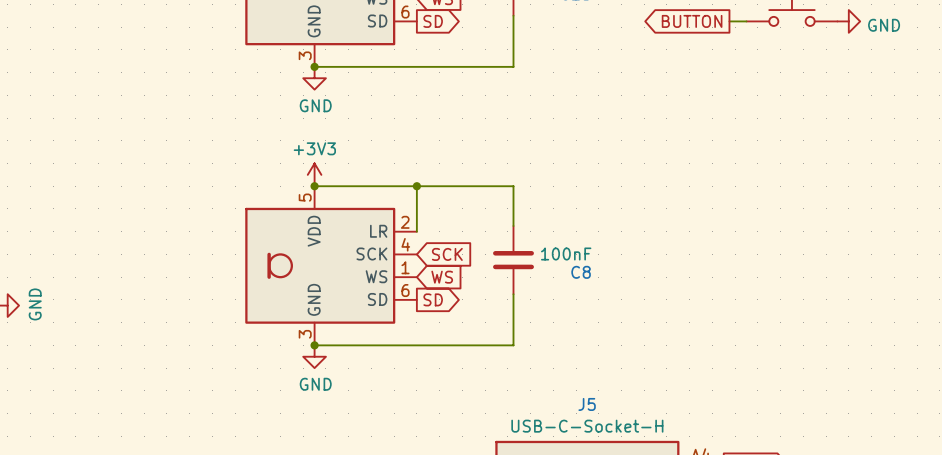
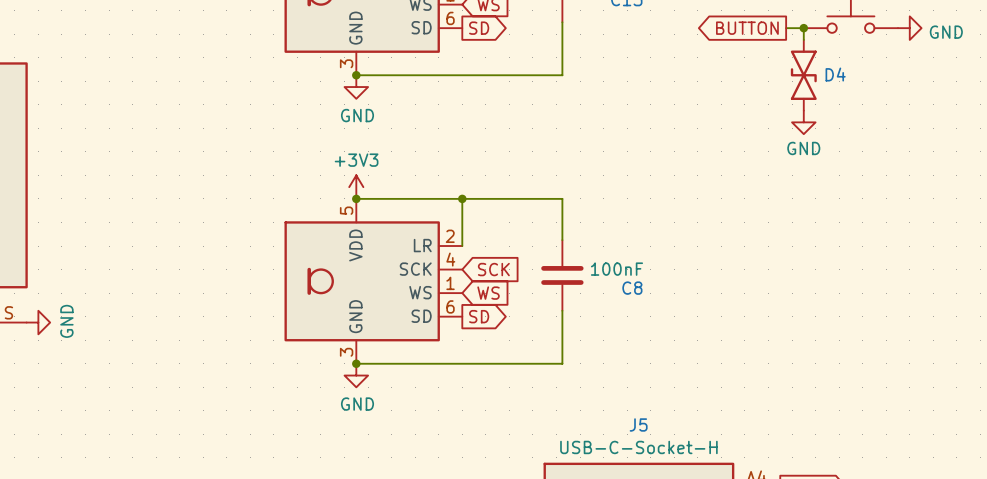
wire: none -> (803, 28) (803, 39)
junction: none -> (803, 28)
D4: none -> (803, 75)
power symbol: none -> GND (803, 122)

